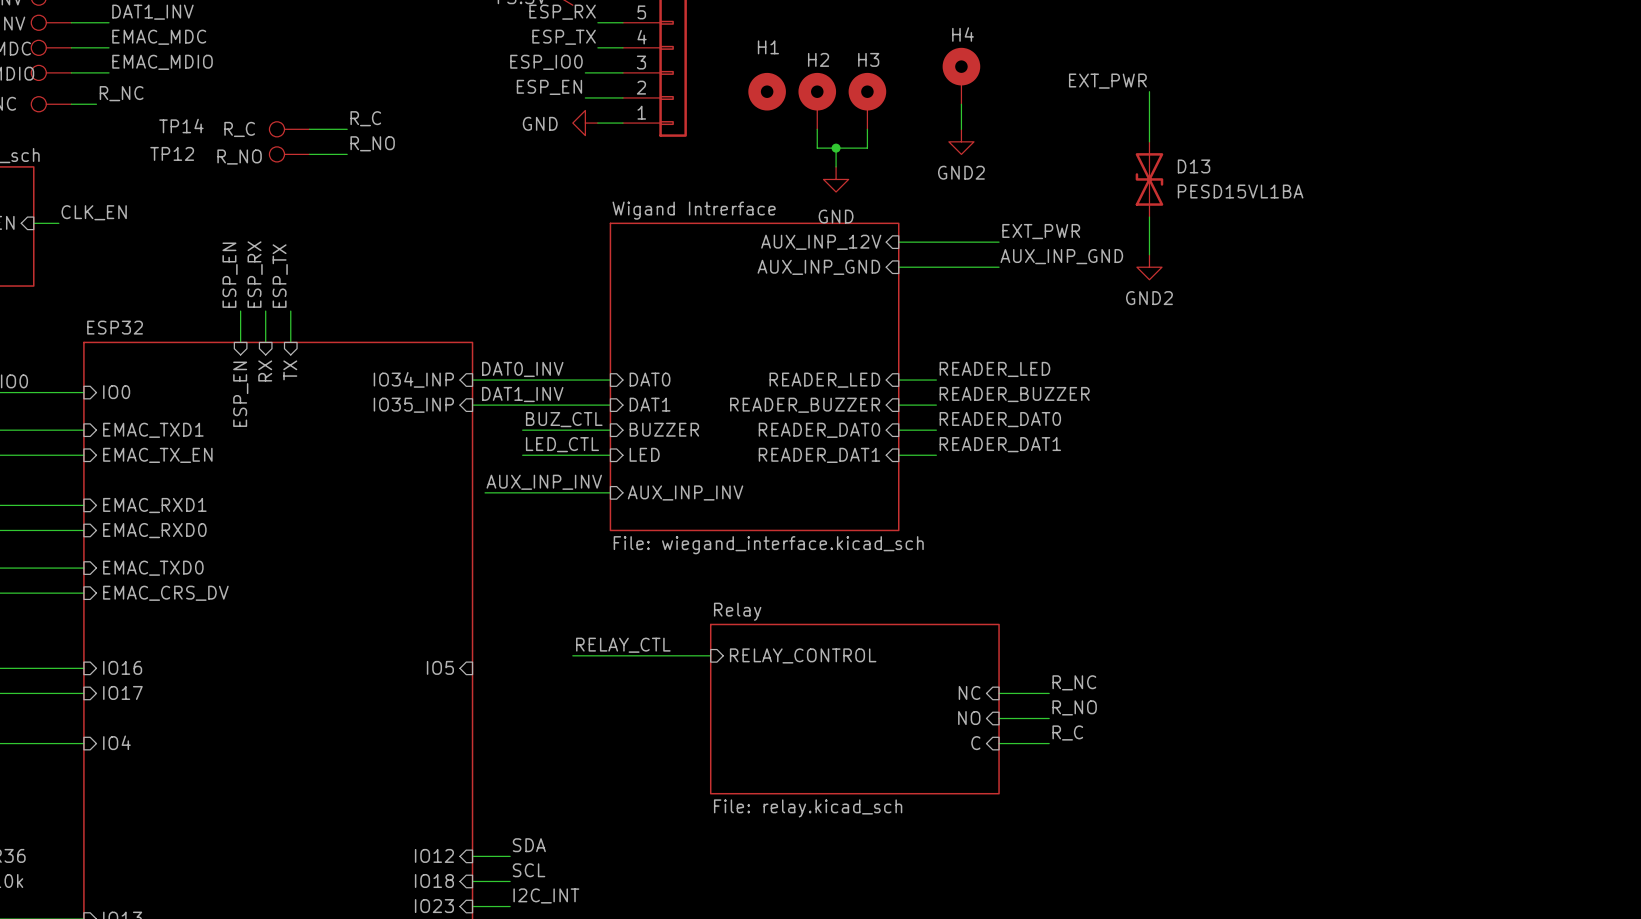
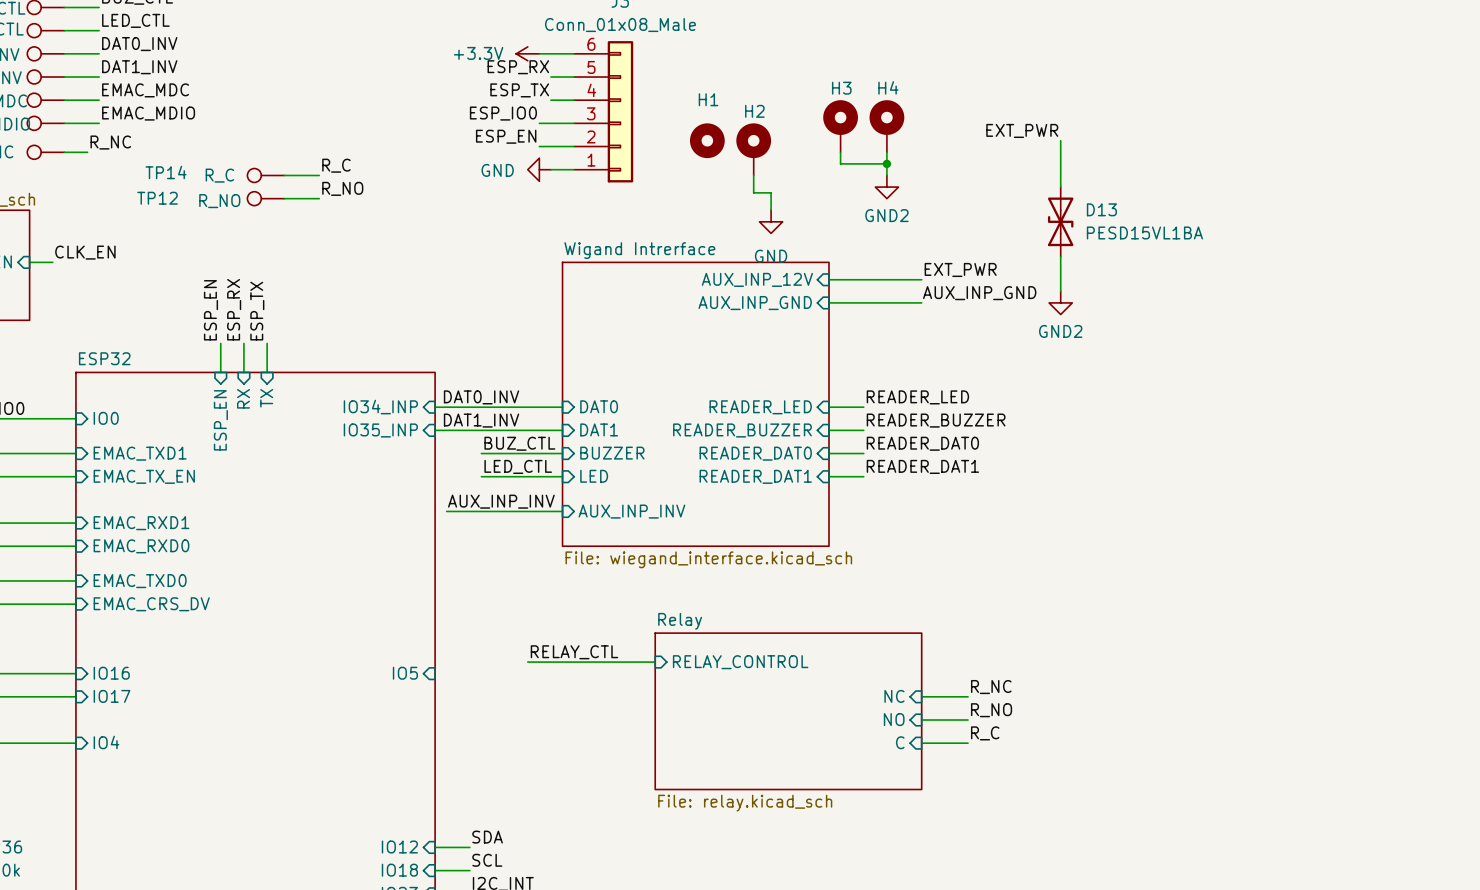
H3 position: (867, 101) -> (840, 126)
wire: none -> (840, 152) (840, 163) (886, 163)
junction: none -> (886, 163)
wire: (867, 129) (867, 148) (836, 148) -> none
junction: (836, 148) -> none

